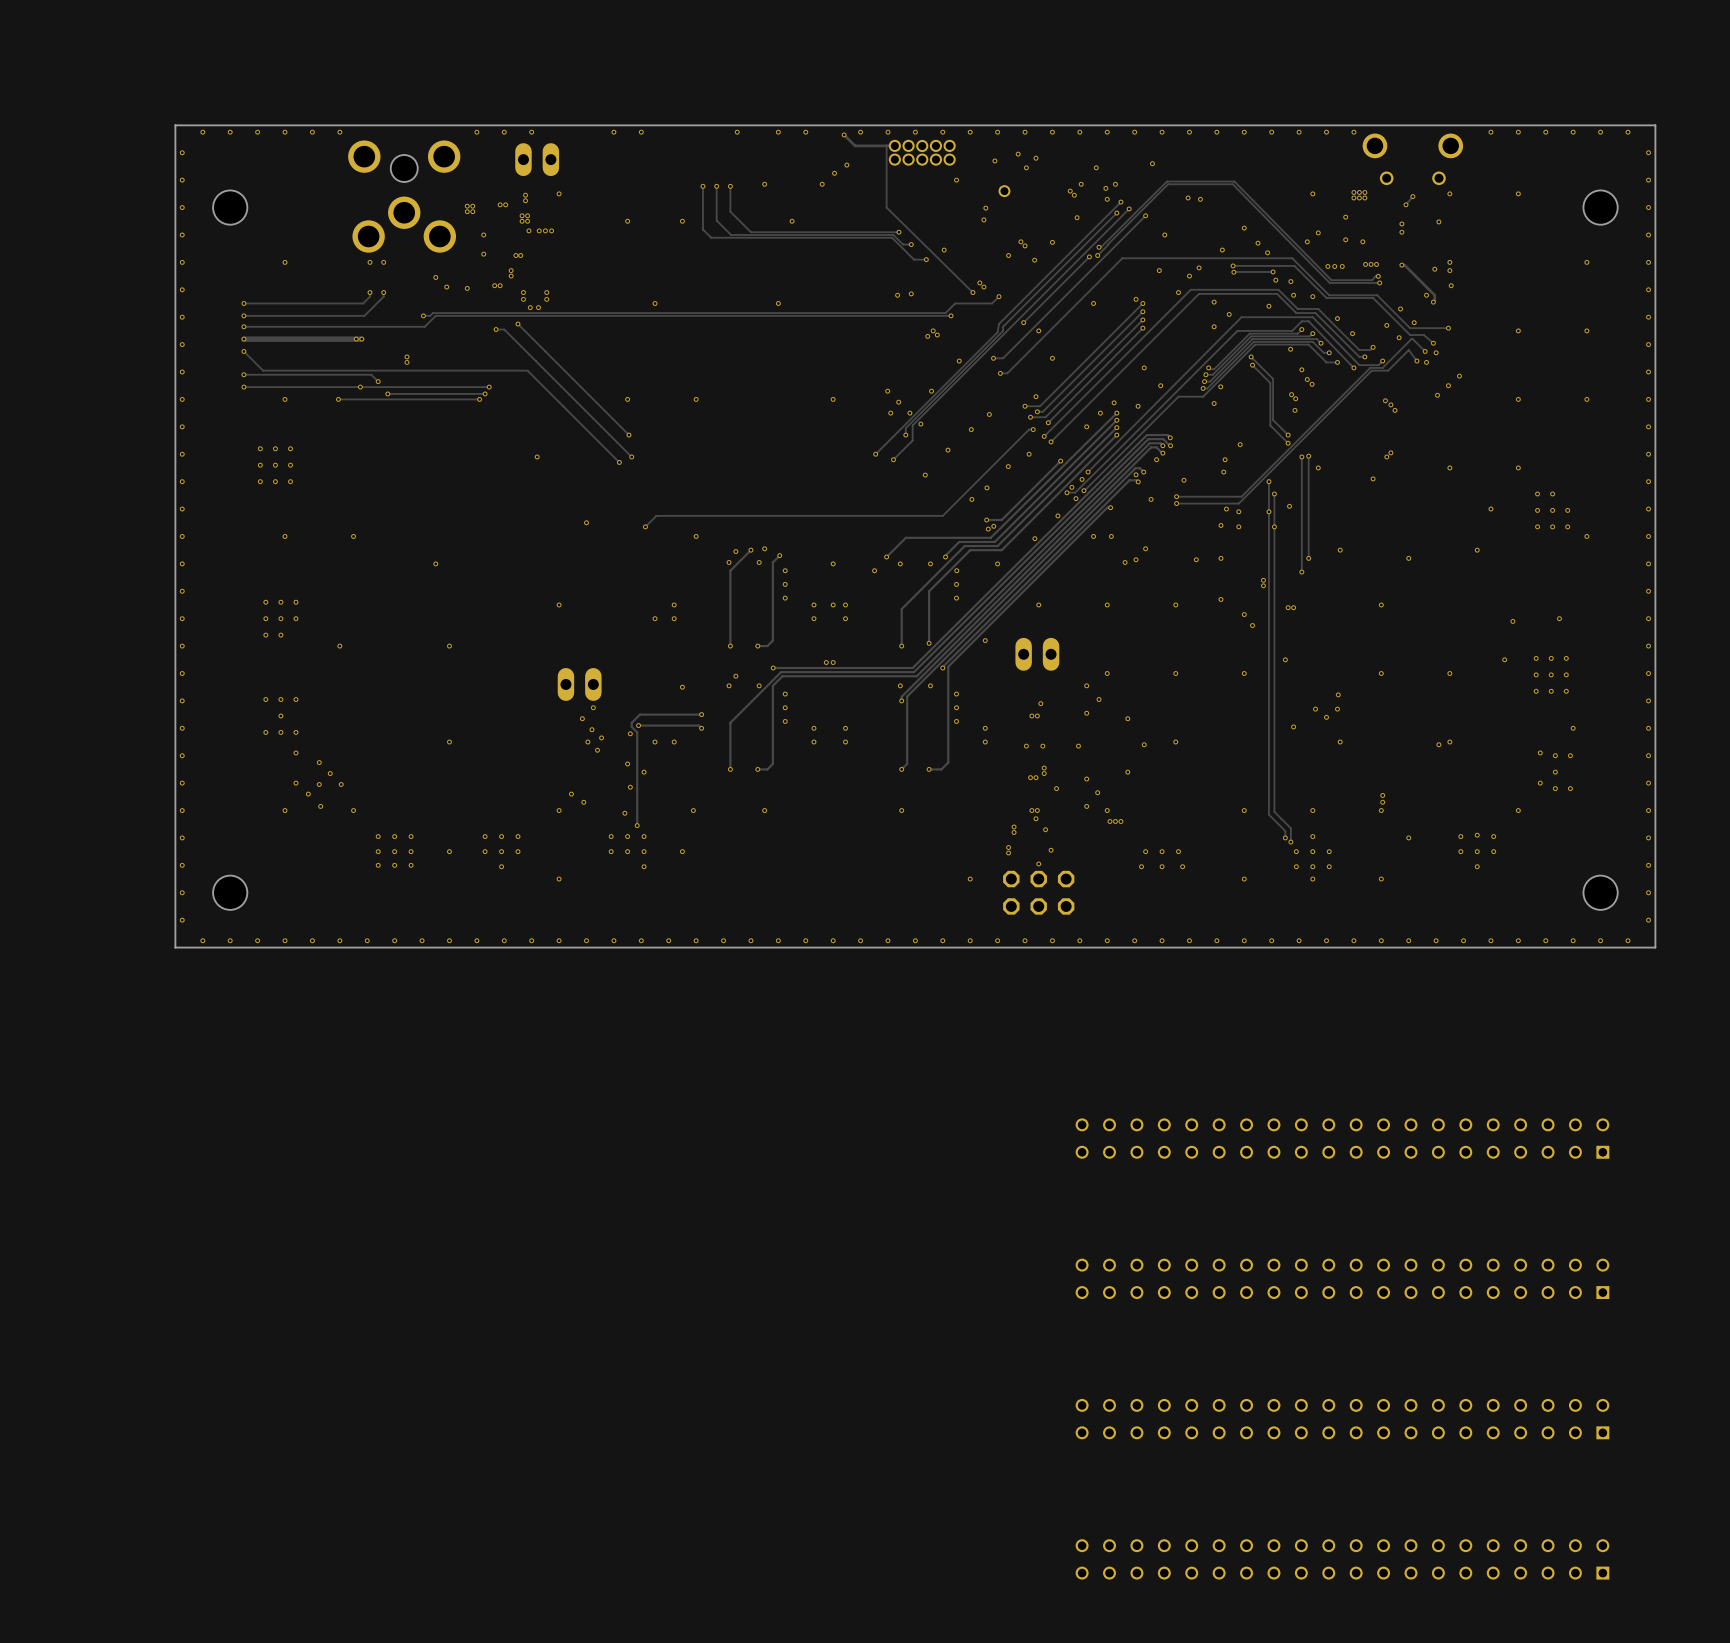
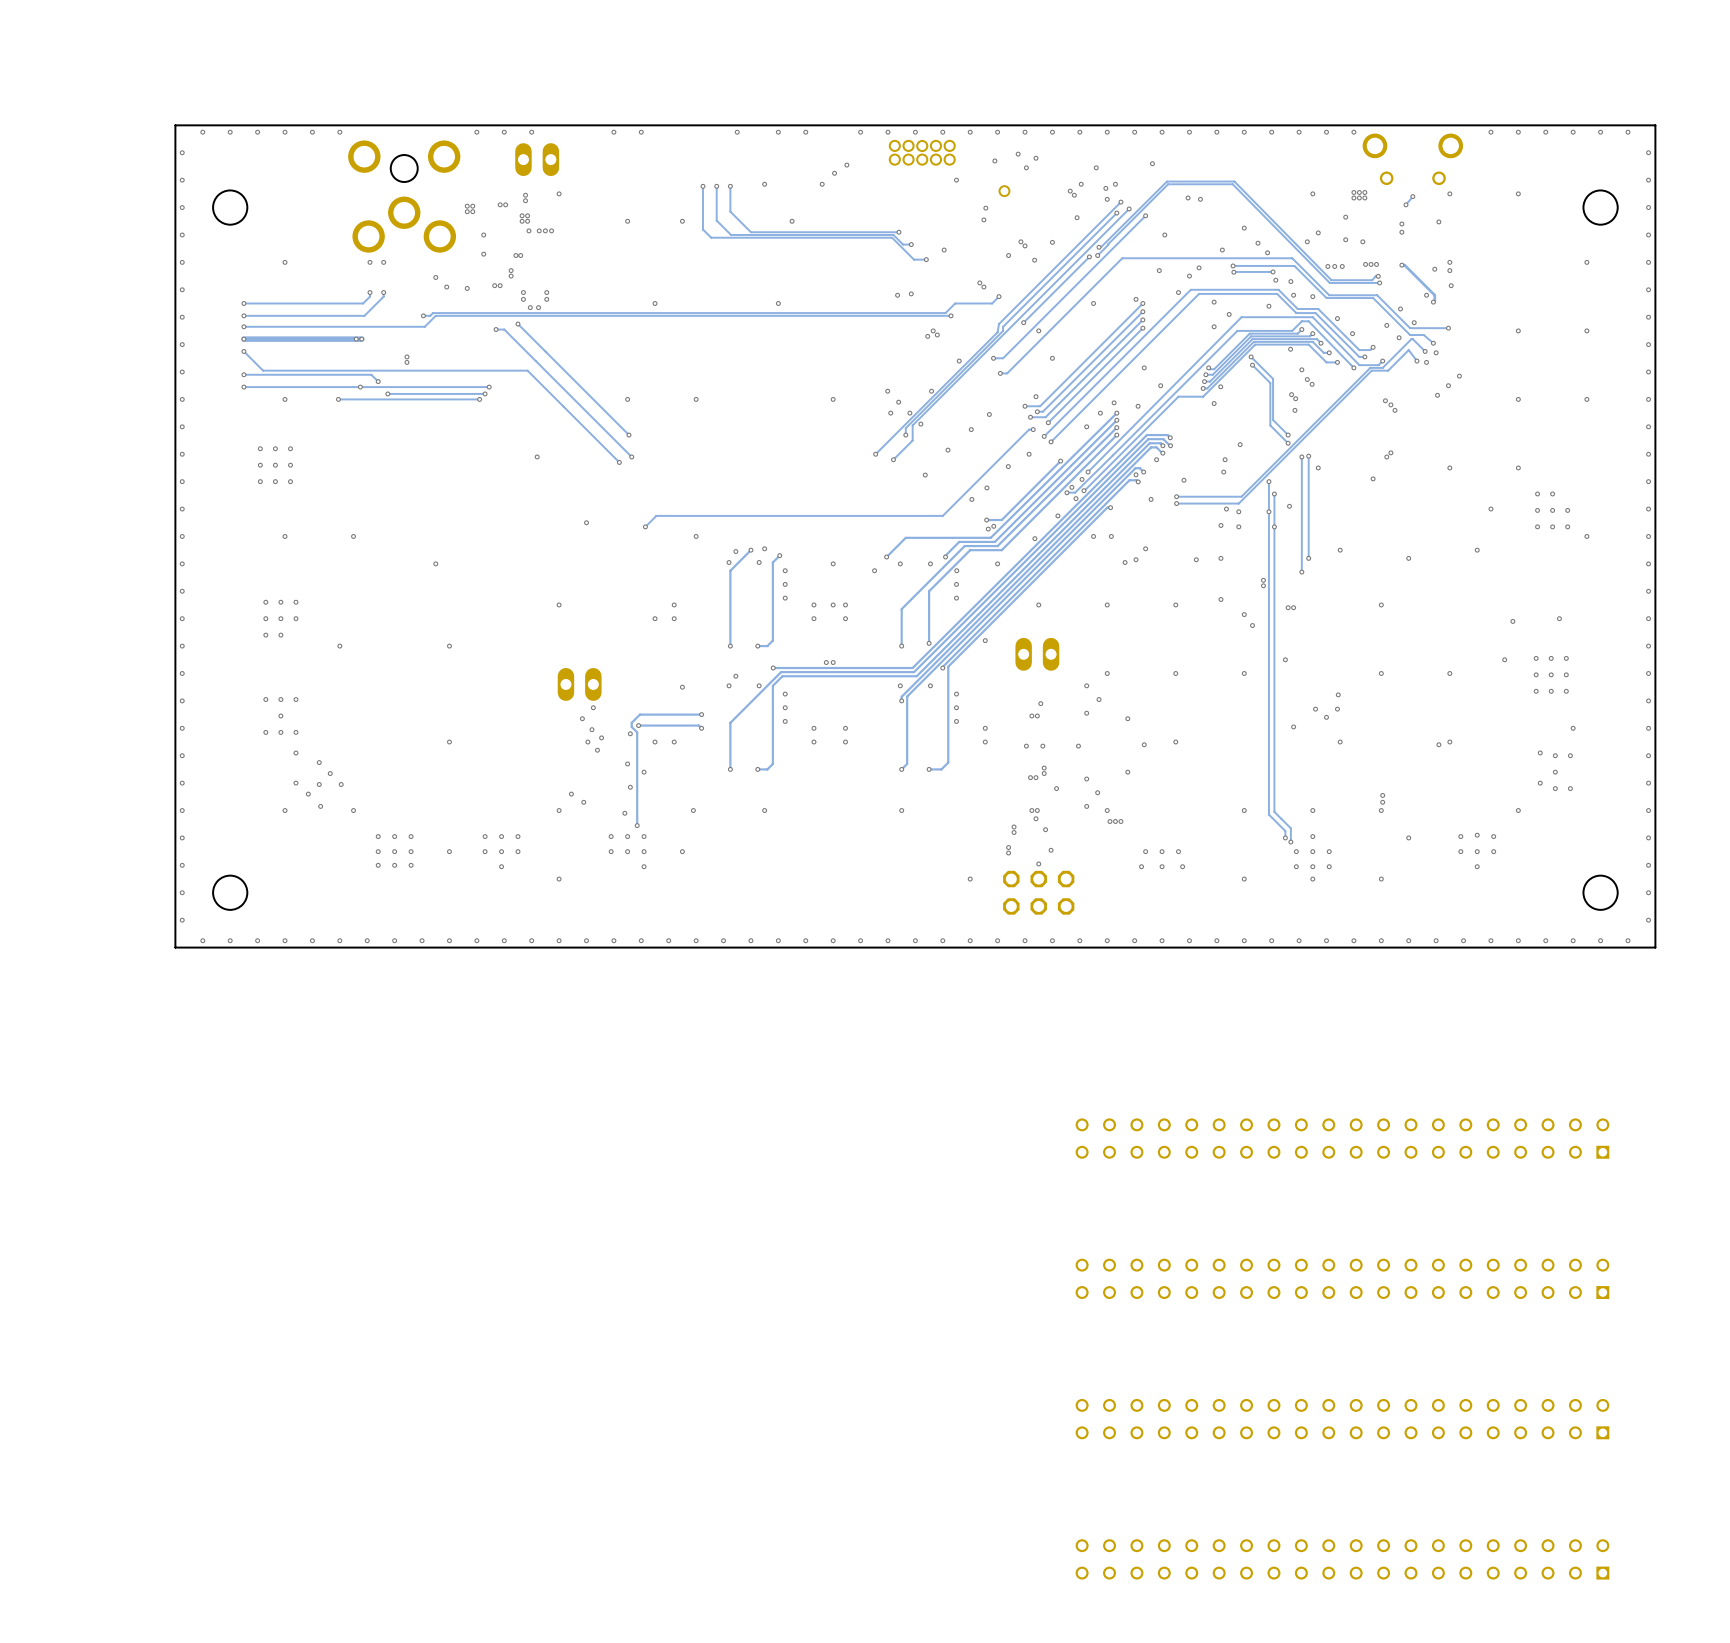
track: (844, 134) (855, 145) (894, 145) -> none
via: (844, 134) -> none
track: (886, 145) (886, 207) (972, 292) -> none
via: (972, 292) -> none

